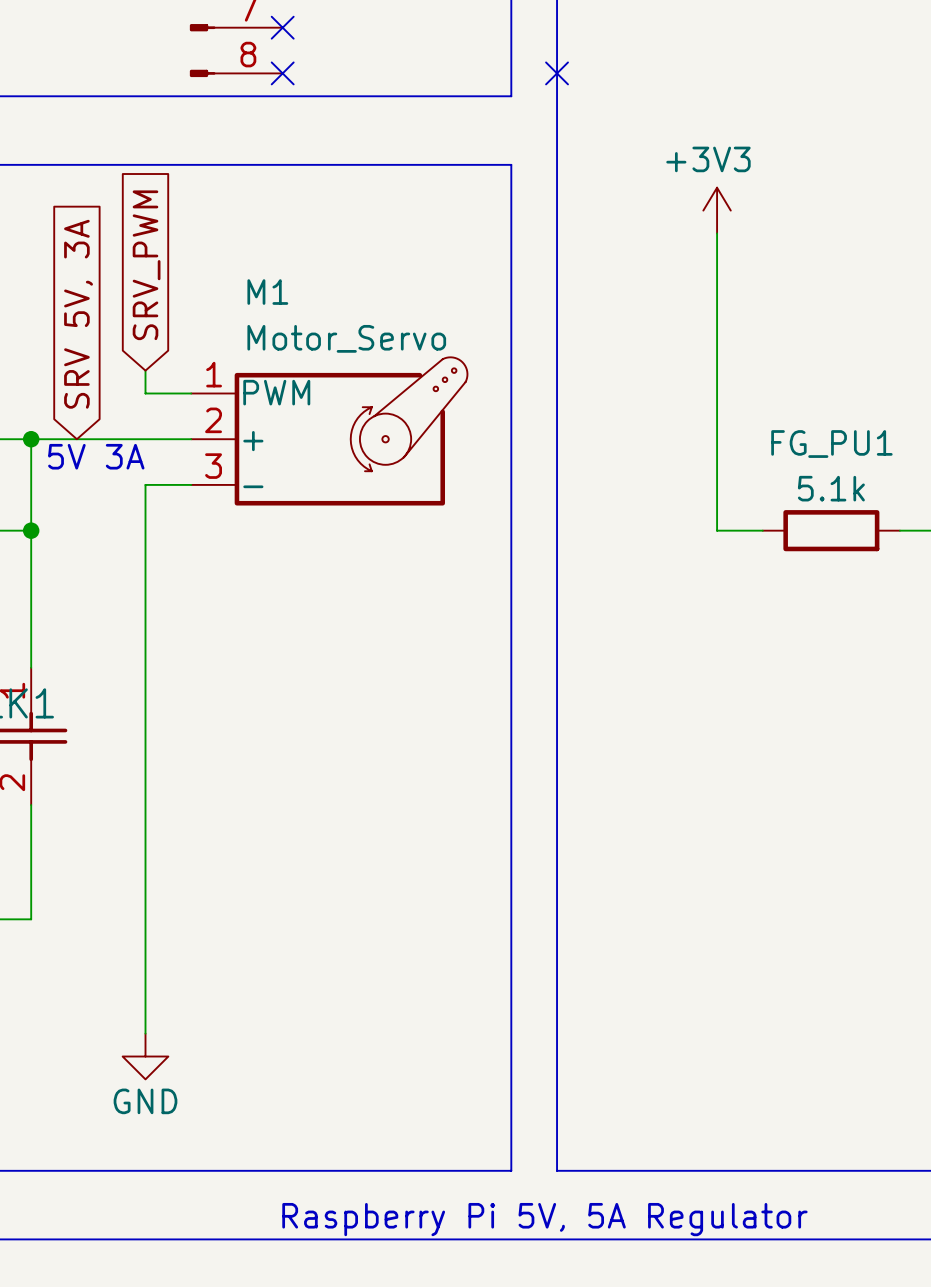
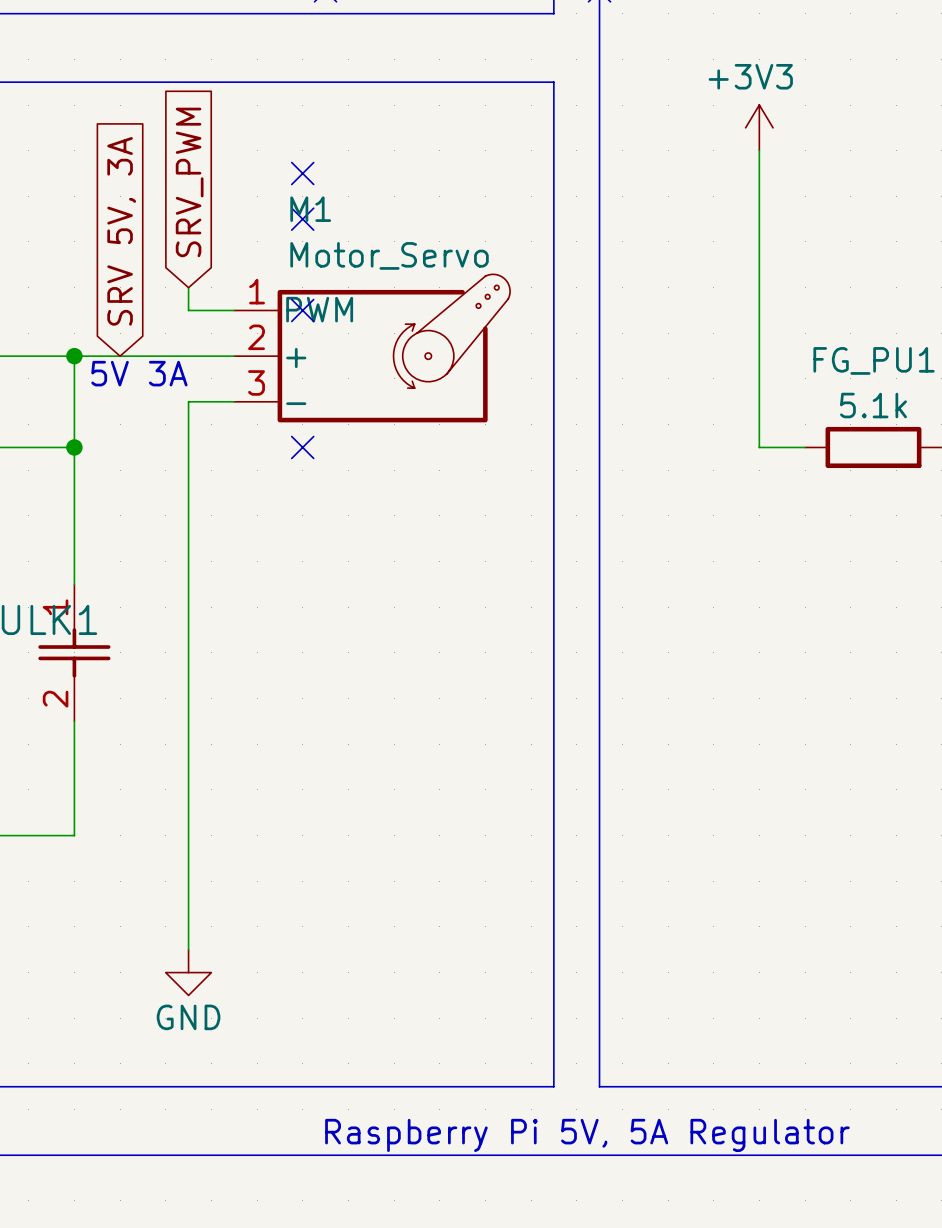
no-connect mark: none -> (302, 173)
no-connect mark: none -> (302, 219)
no-connect mark: none -> (302, 310)
no-connect mark: none -> (302, 447)

